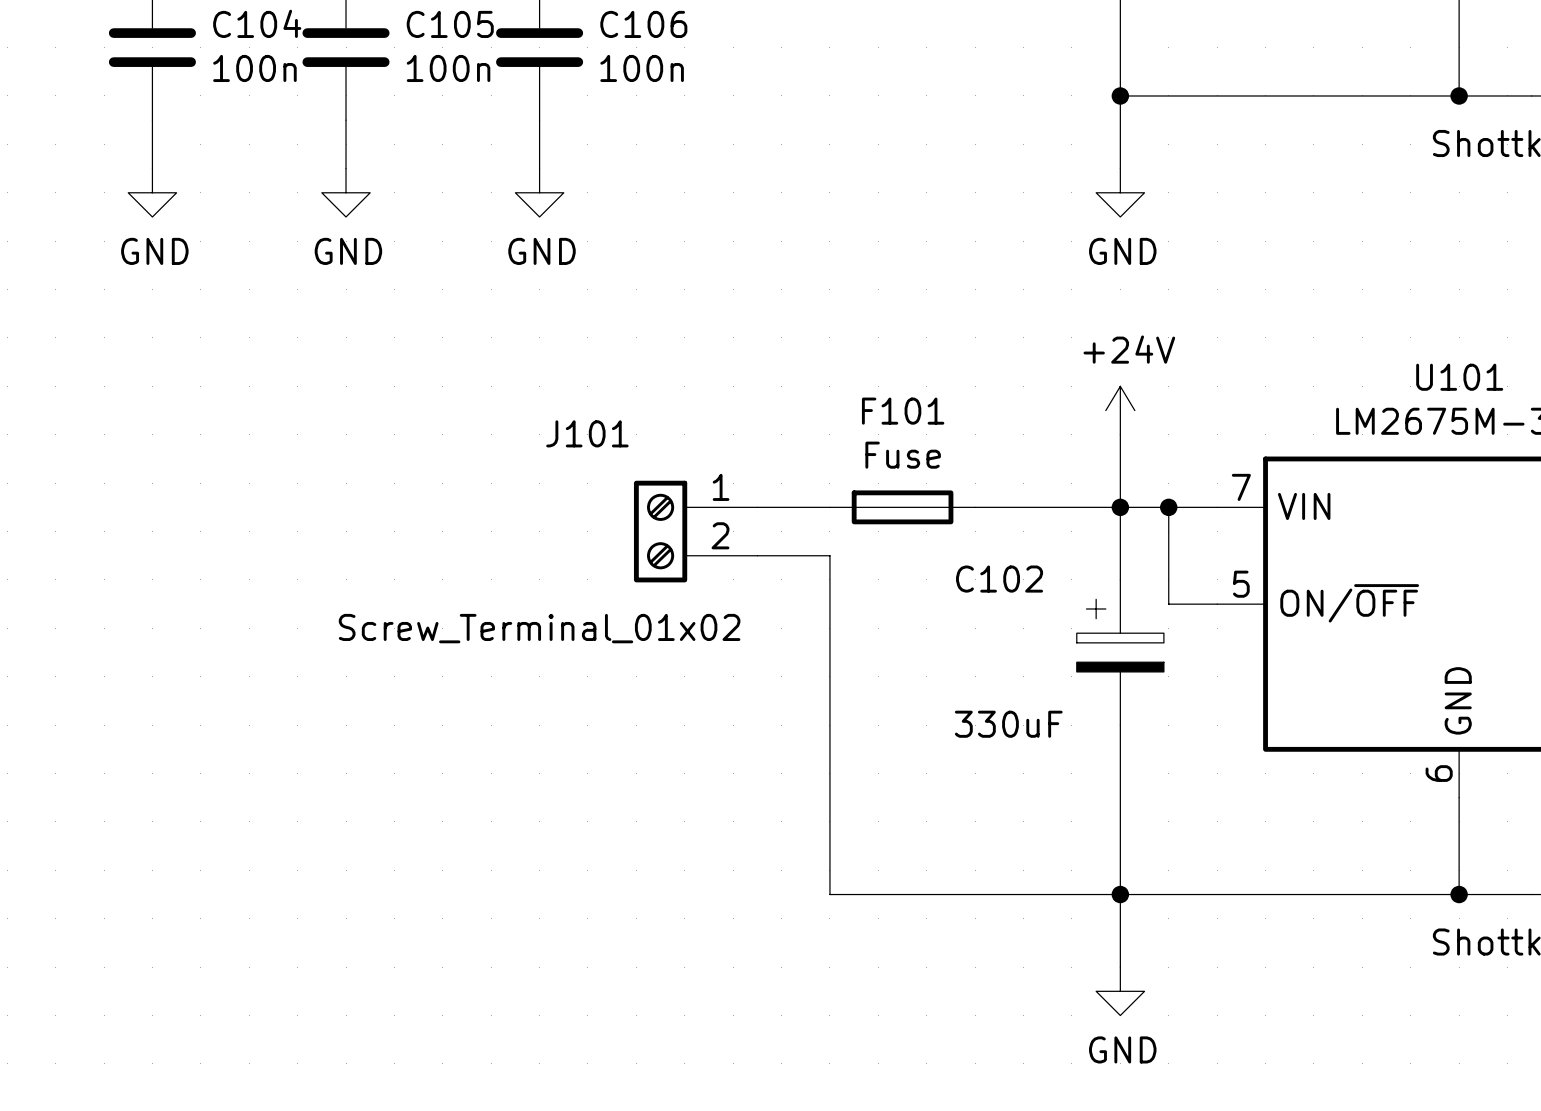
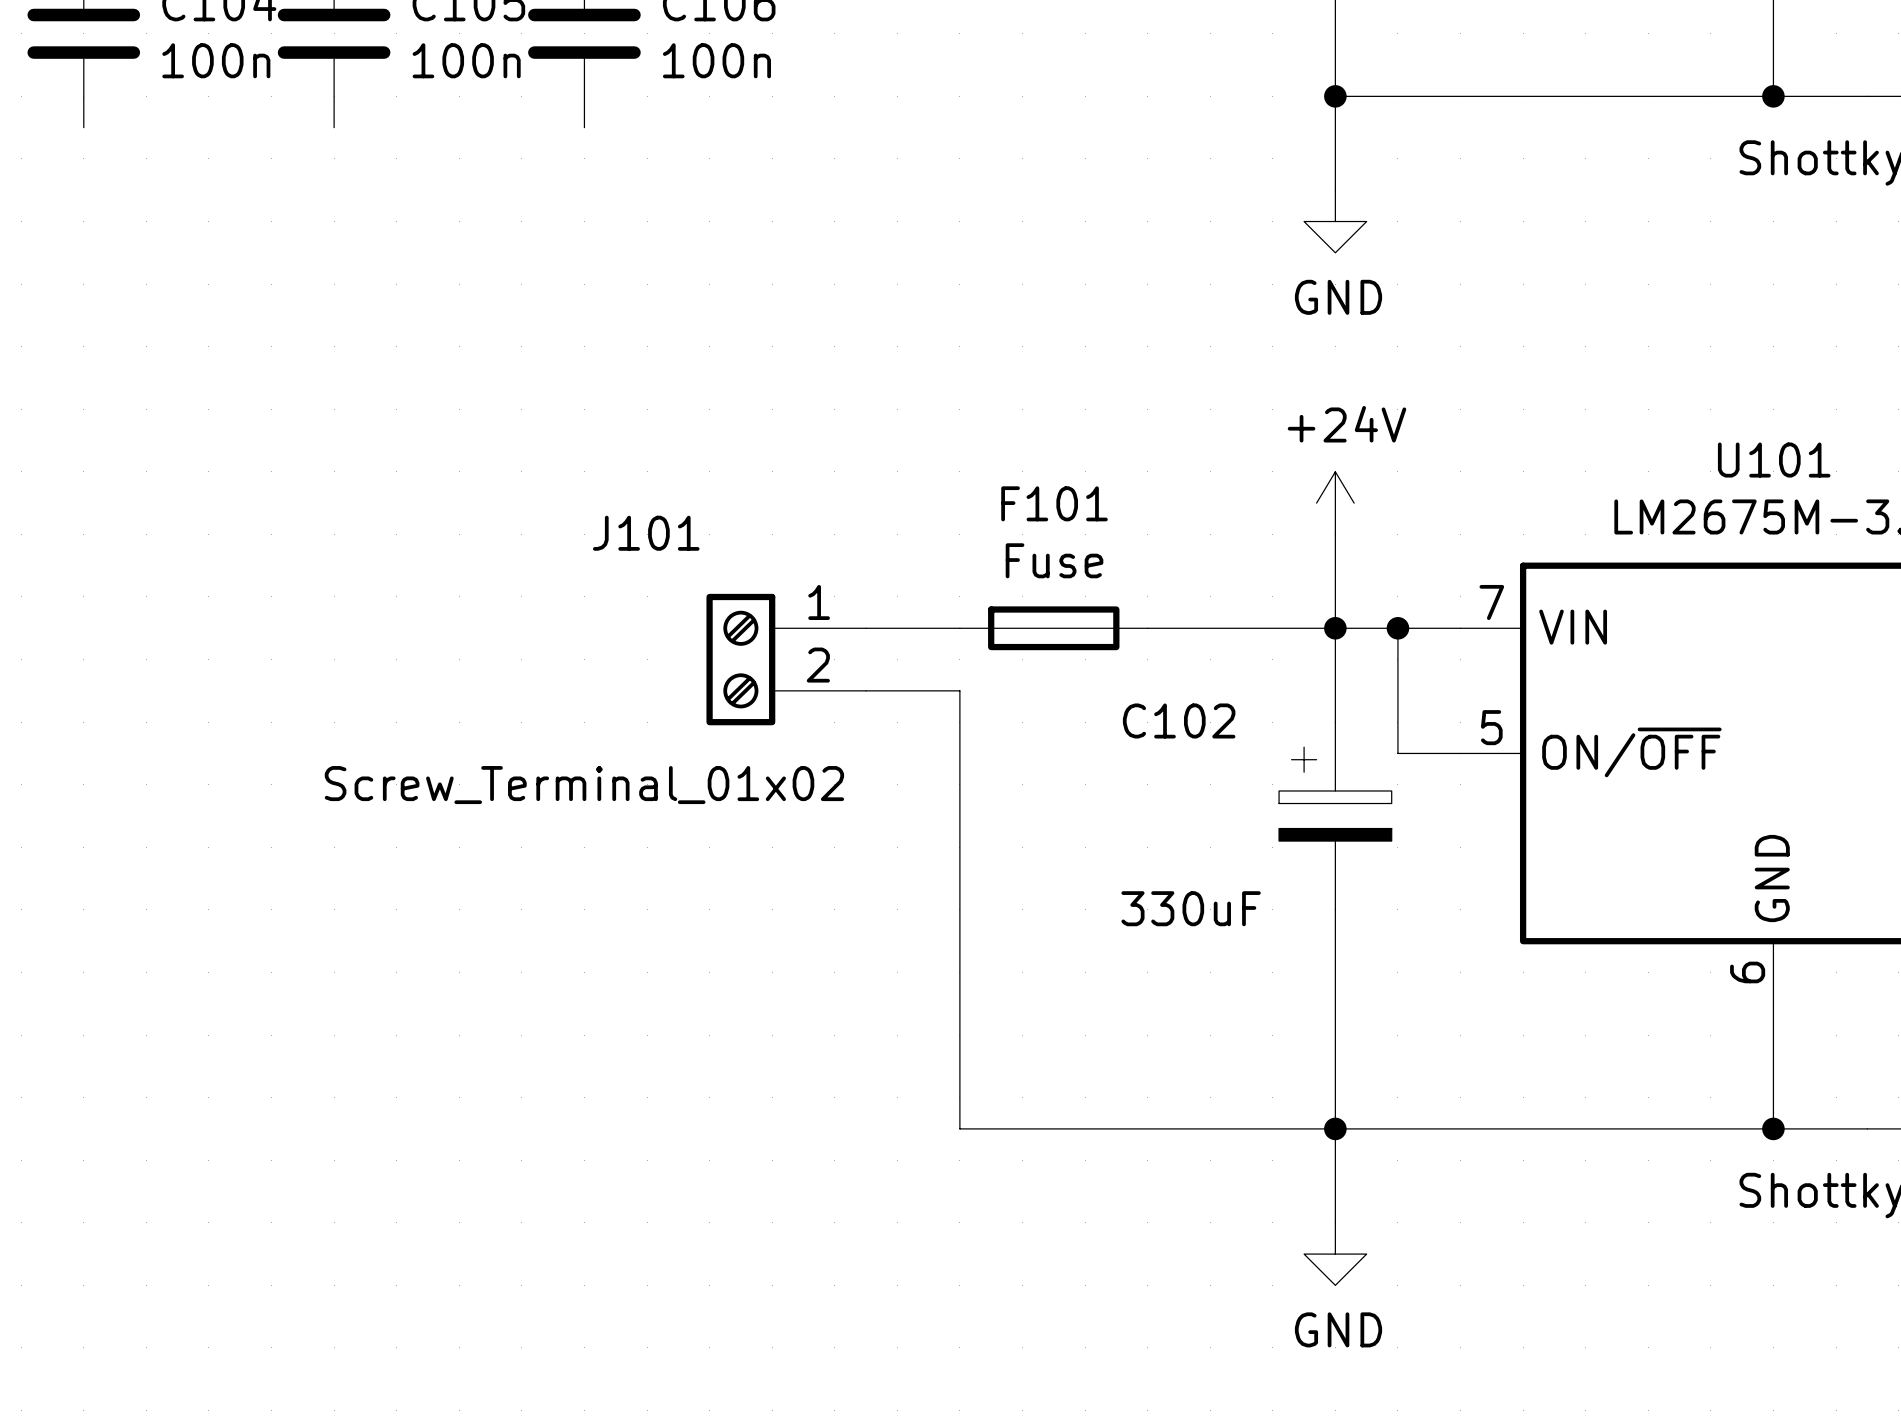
wire: (152, 120) (152, 168) -> none
wire: (346, 120) (346, 168) -> none
wire: (539, 120) (539, 168) -> none
power symbol: GND (152, 192) -> none
power symbol: GND (346, 192) -> none
power symbol: GND (539, 192) -> none

